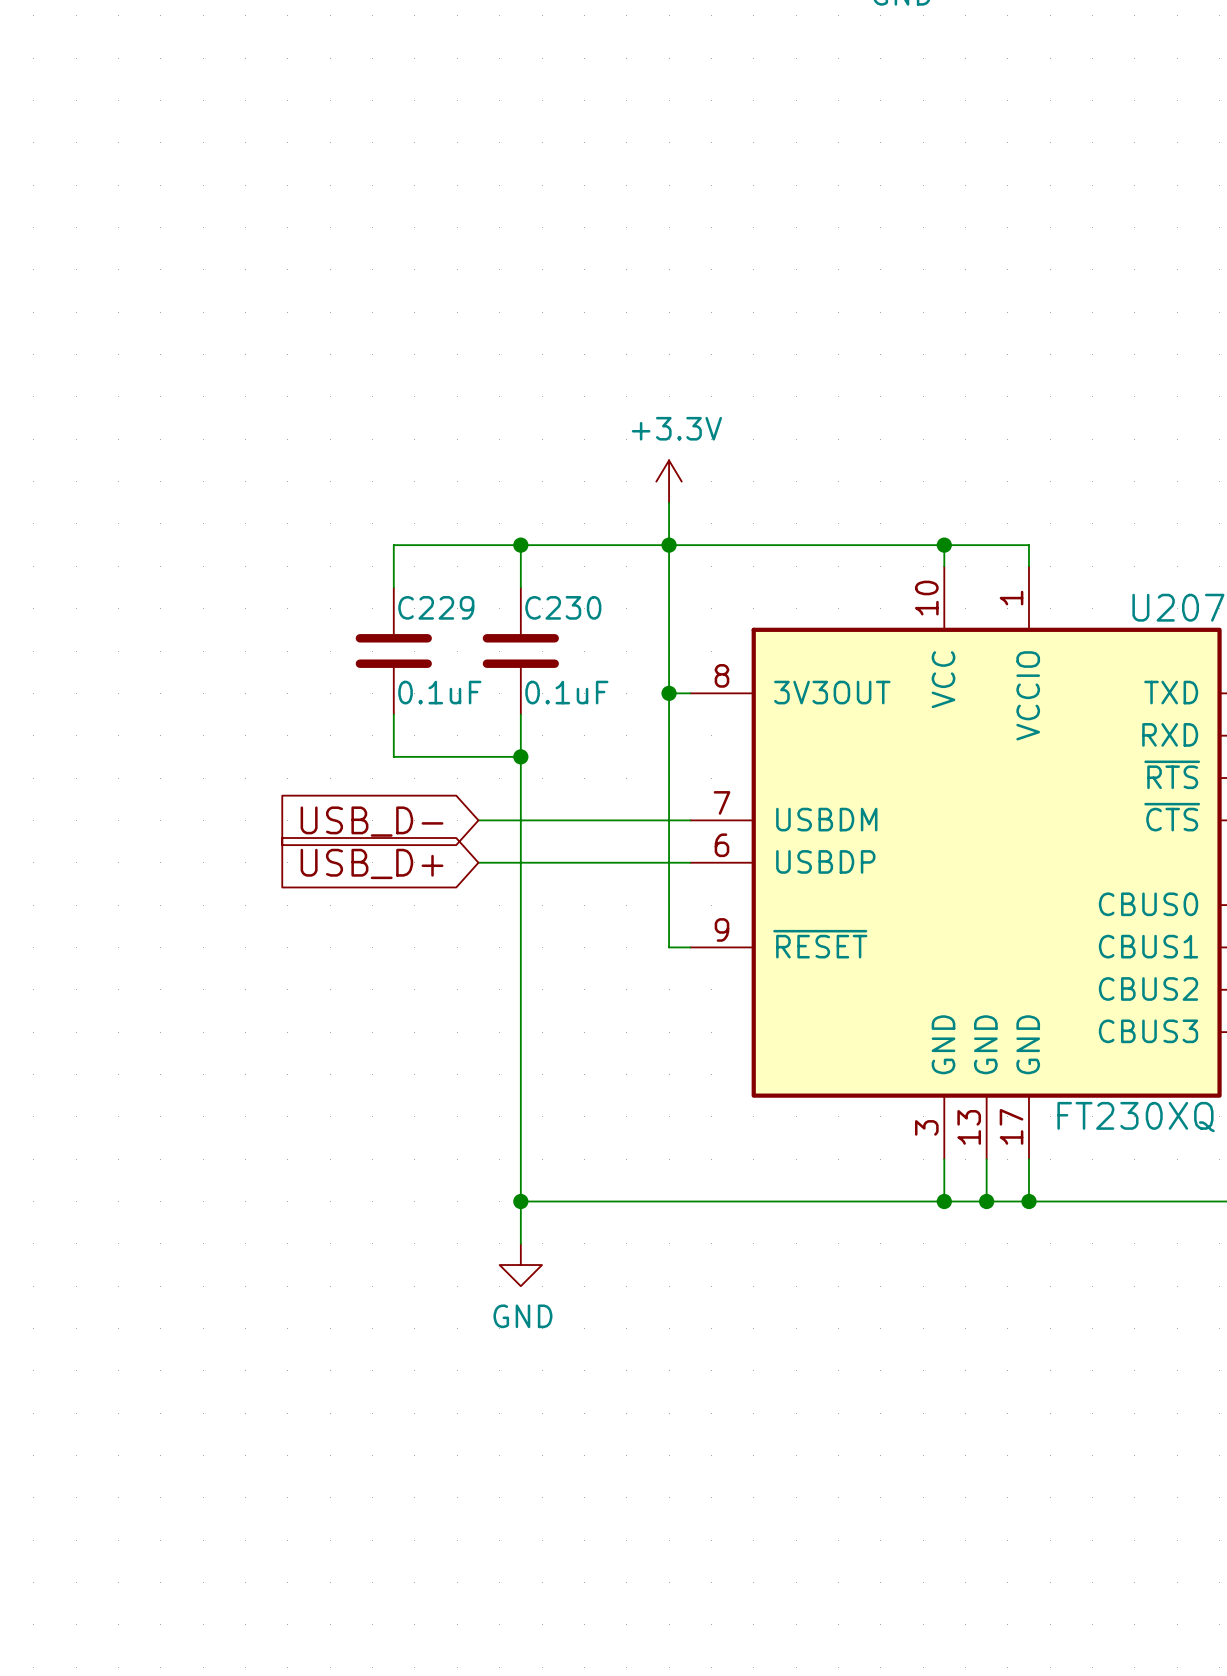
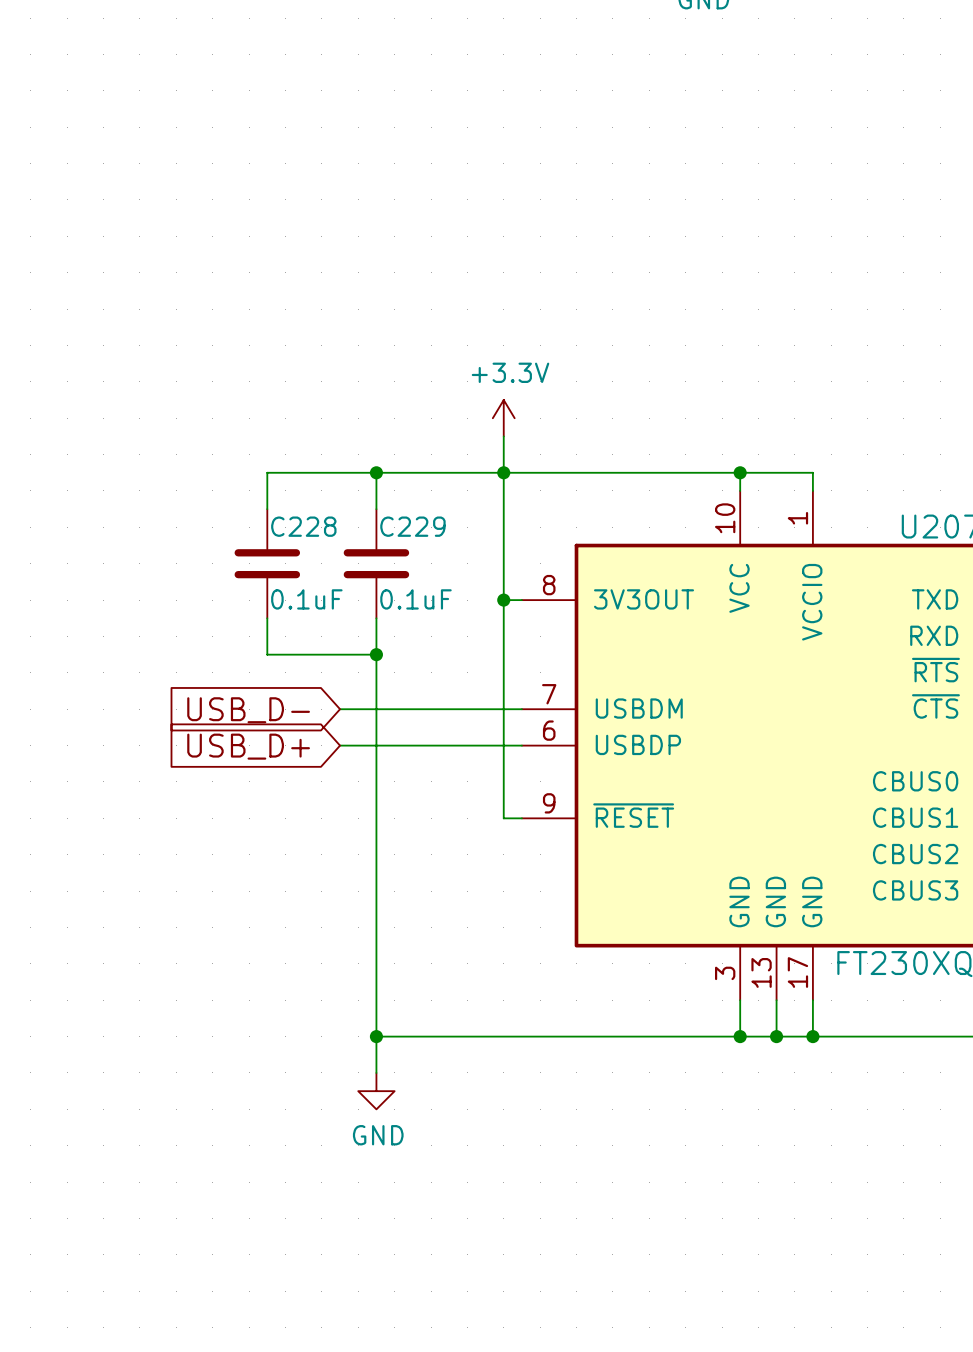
C229 name: C229 (436, 607) -> C228 (303, 526)
C230 name: C230 (563, 607) -> C229 (412, 526)

